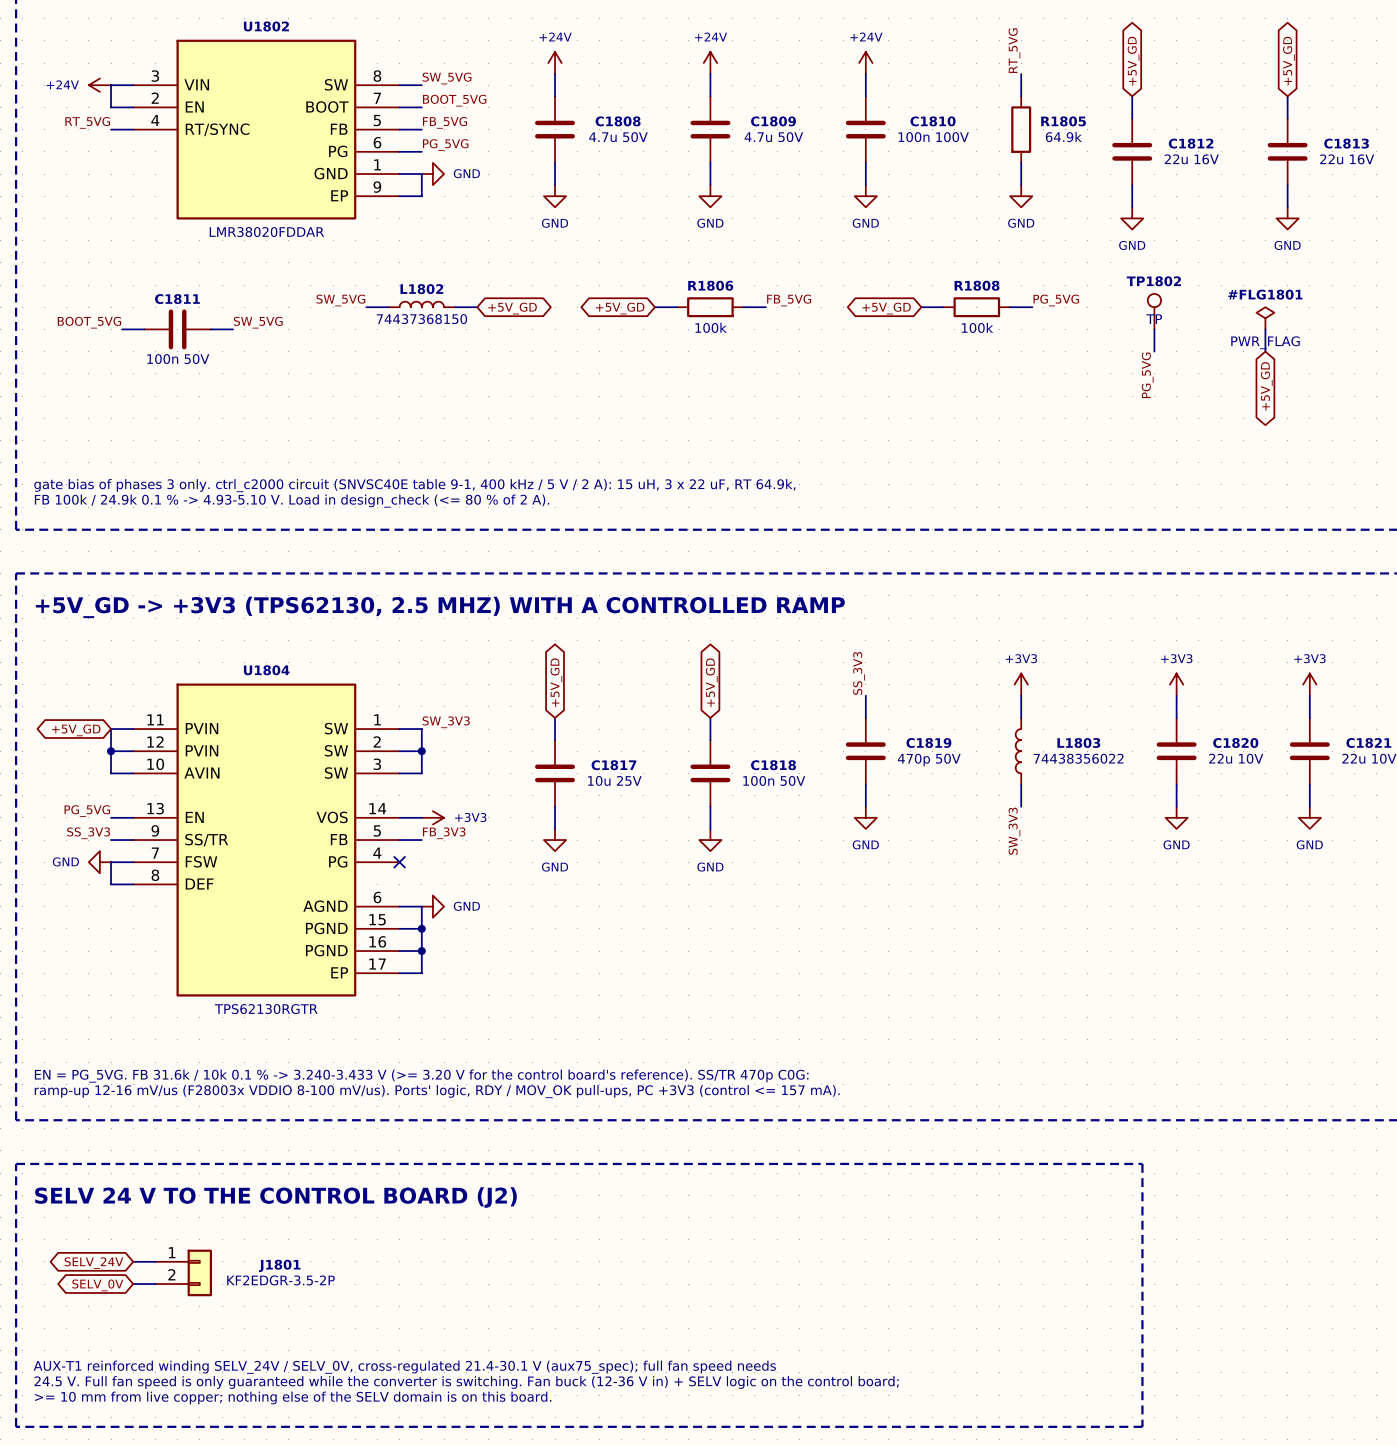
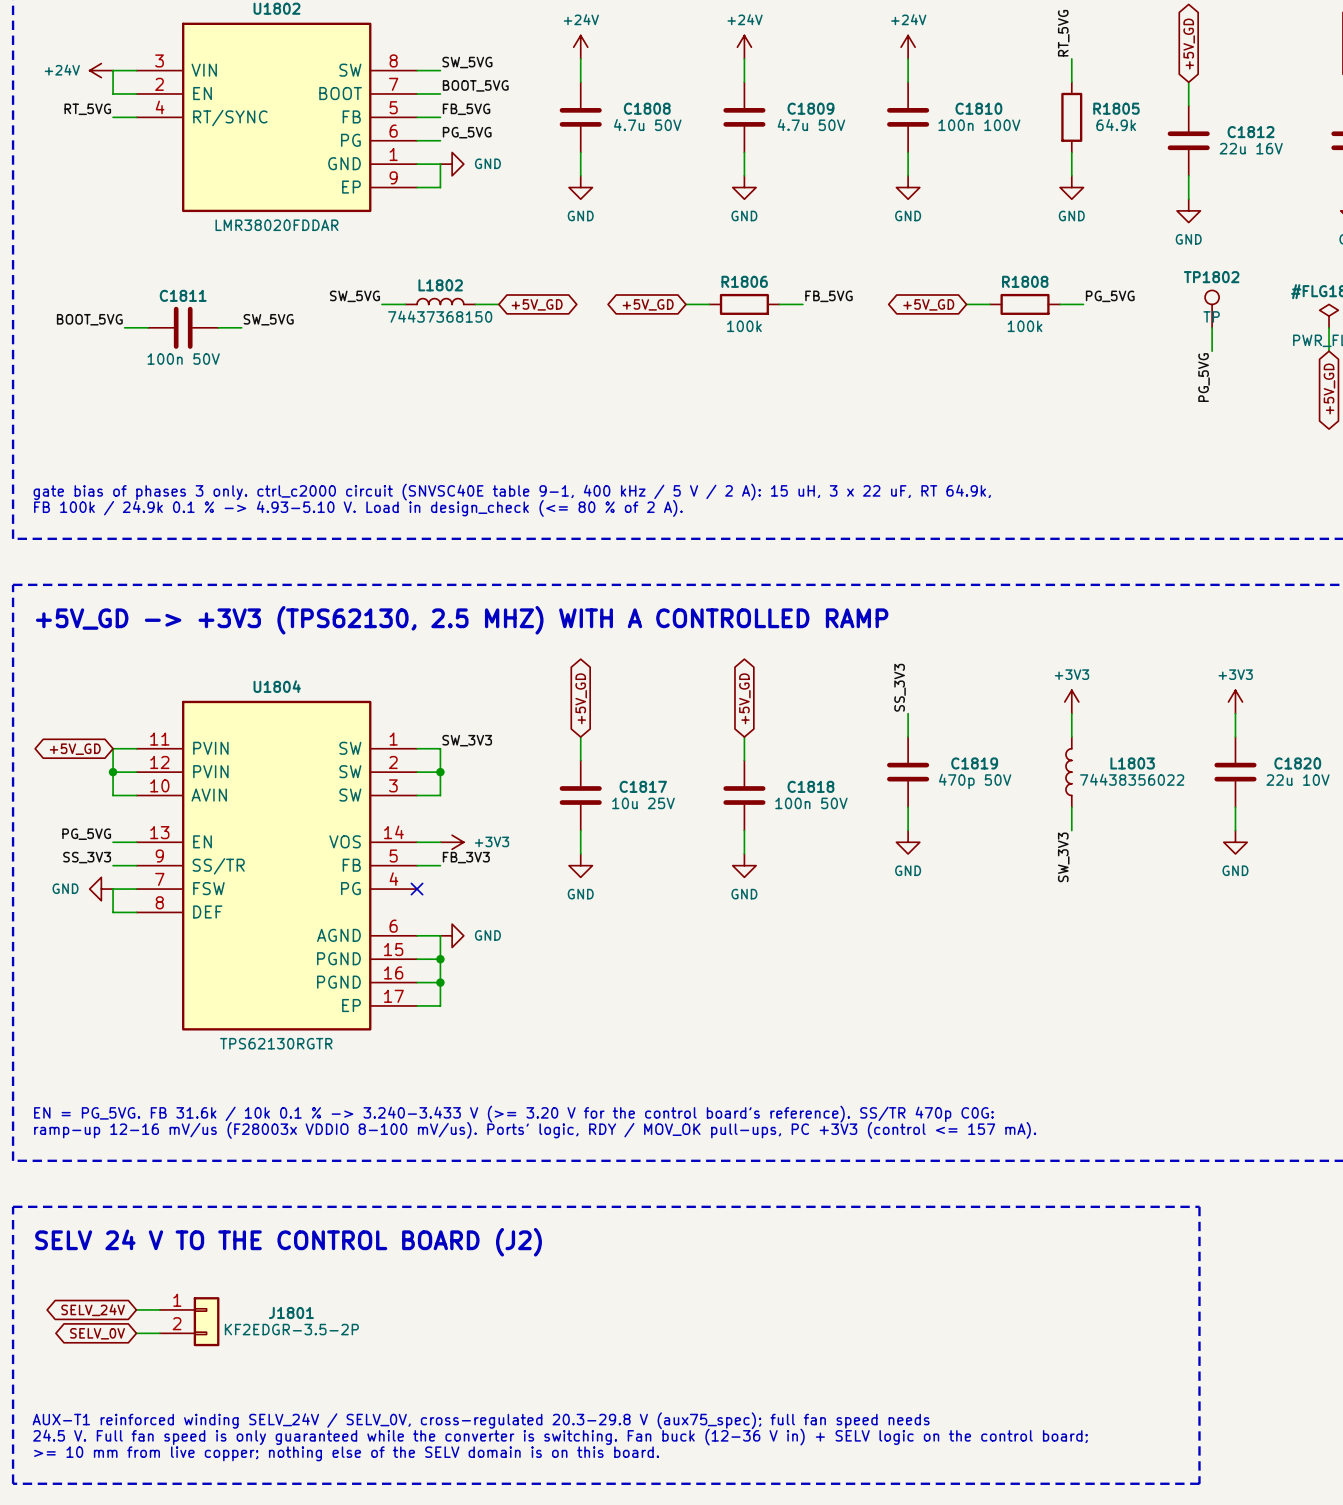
text: AUX-T1 reinforced winding SELV_24V / SELV_0V, cross-regulated 21.4-30.1 V (aux75_spec); full fan speed needs (404, 1367) -> AUX-T1 reinforced winding SELV_24V / SELV_0V, cross-regulated 20.3-29.8 V (aux75_spec); full fan speed needs (481, 1420)

